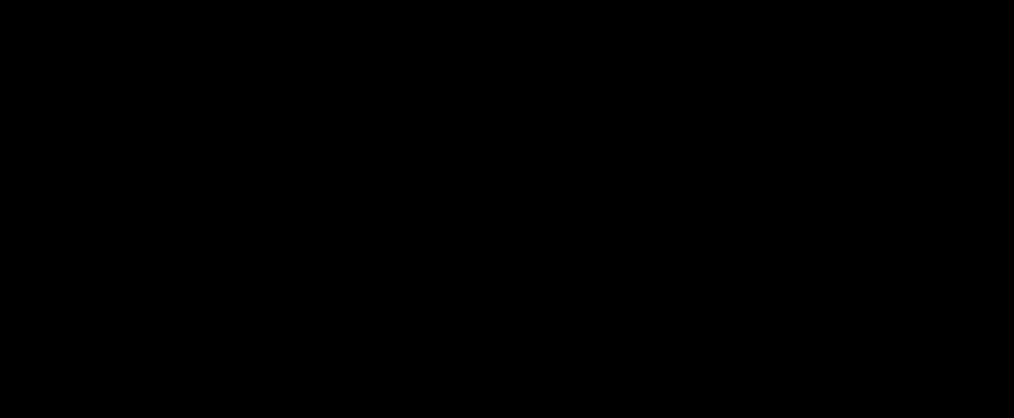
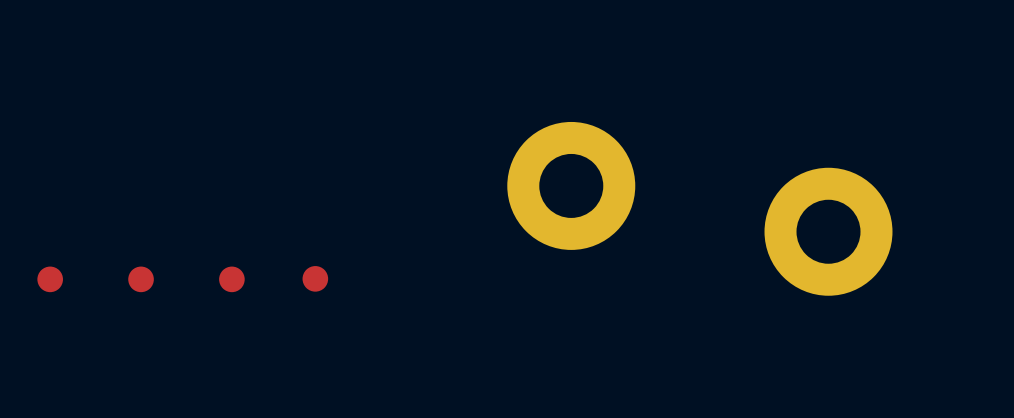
part: none -> (571, 185)
part: none -> (828, 231)
part: none -> (315, 278)
part: none -> (50, 279)
part: none -> (141, 279)
part: none -> (231, 279)

